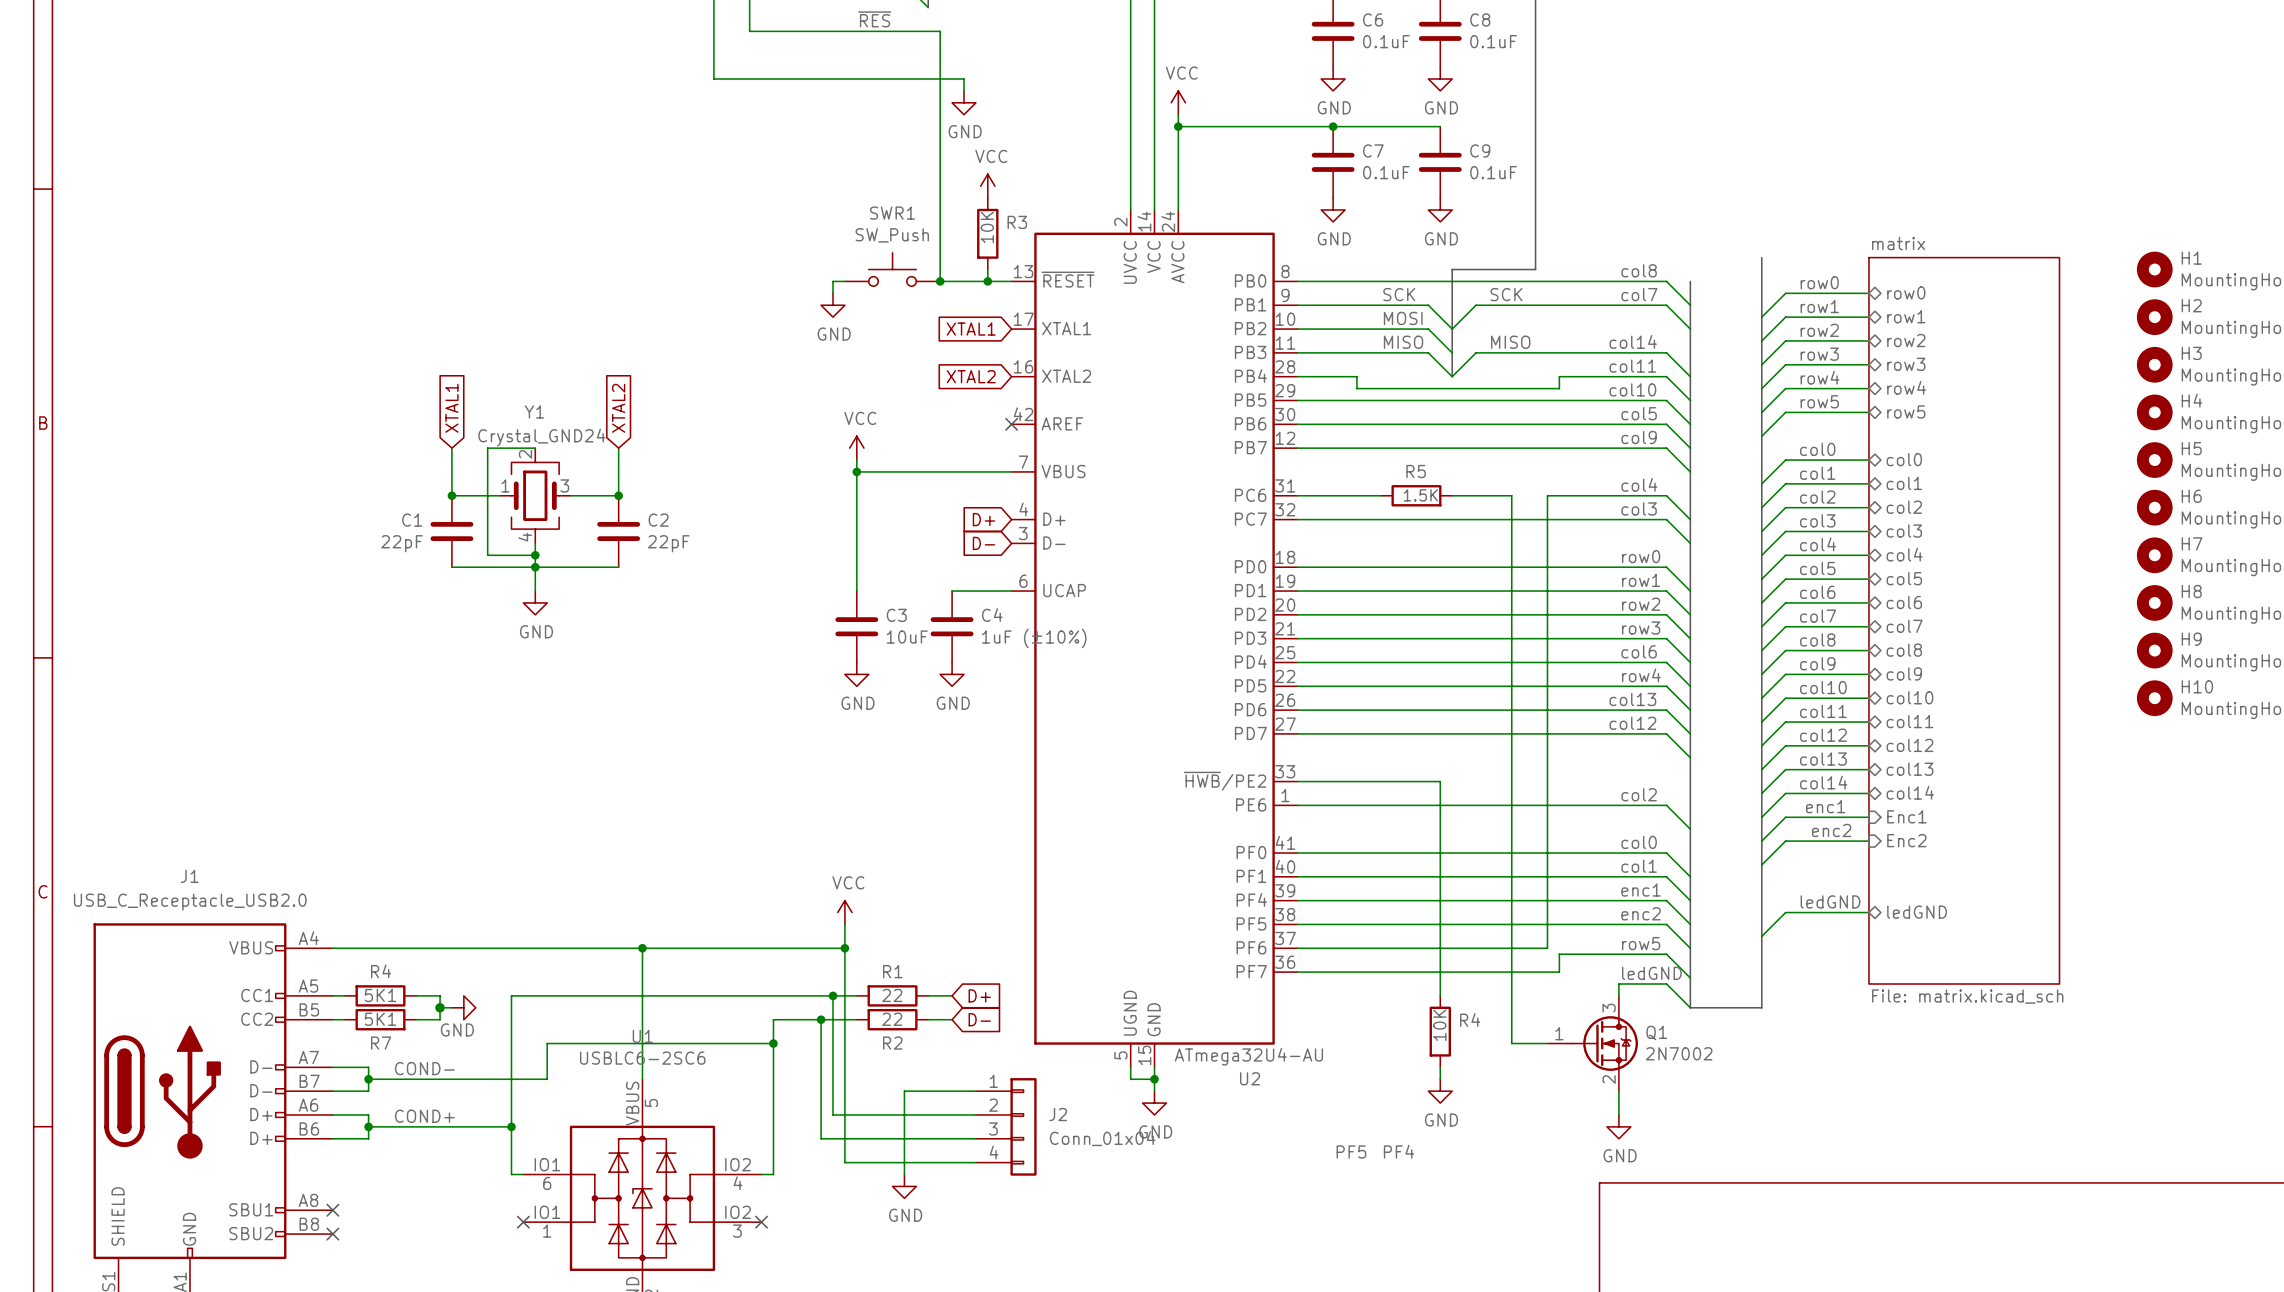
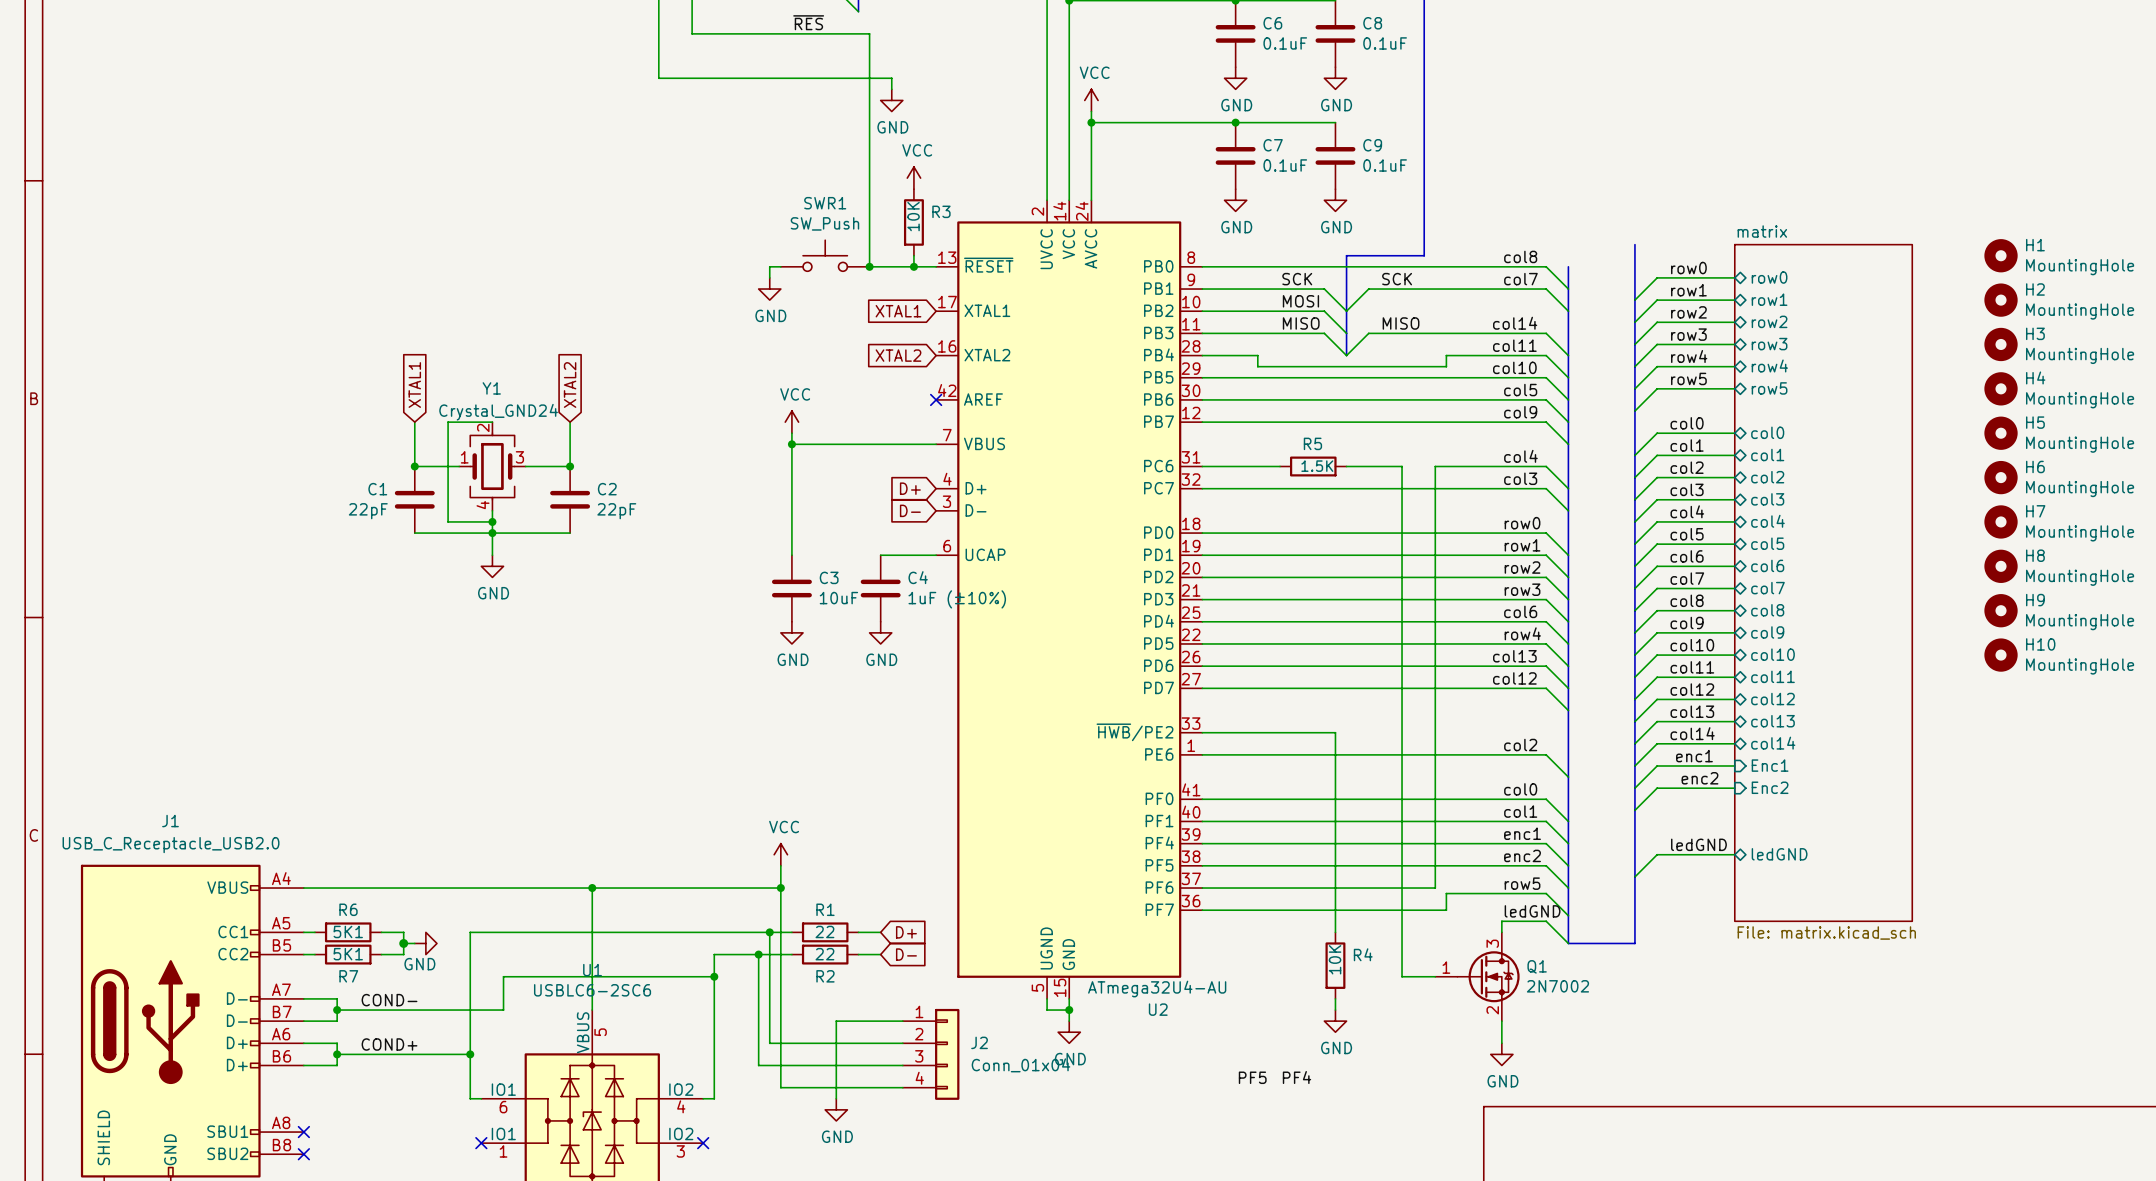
R4 name: R4 (381, 971) -> R6 (348, 909)

